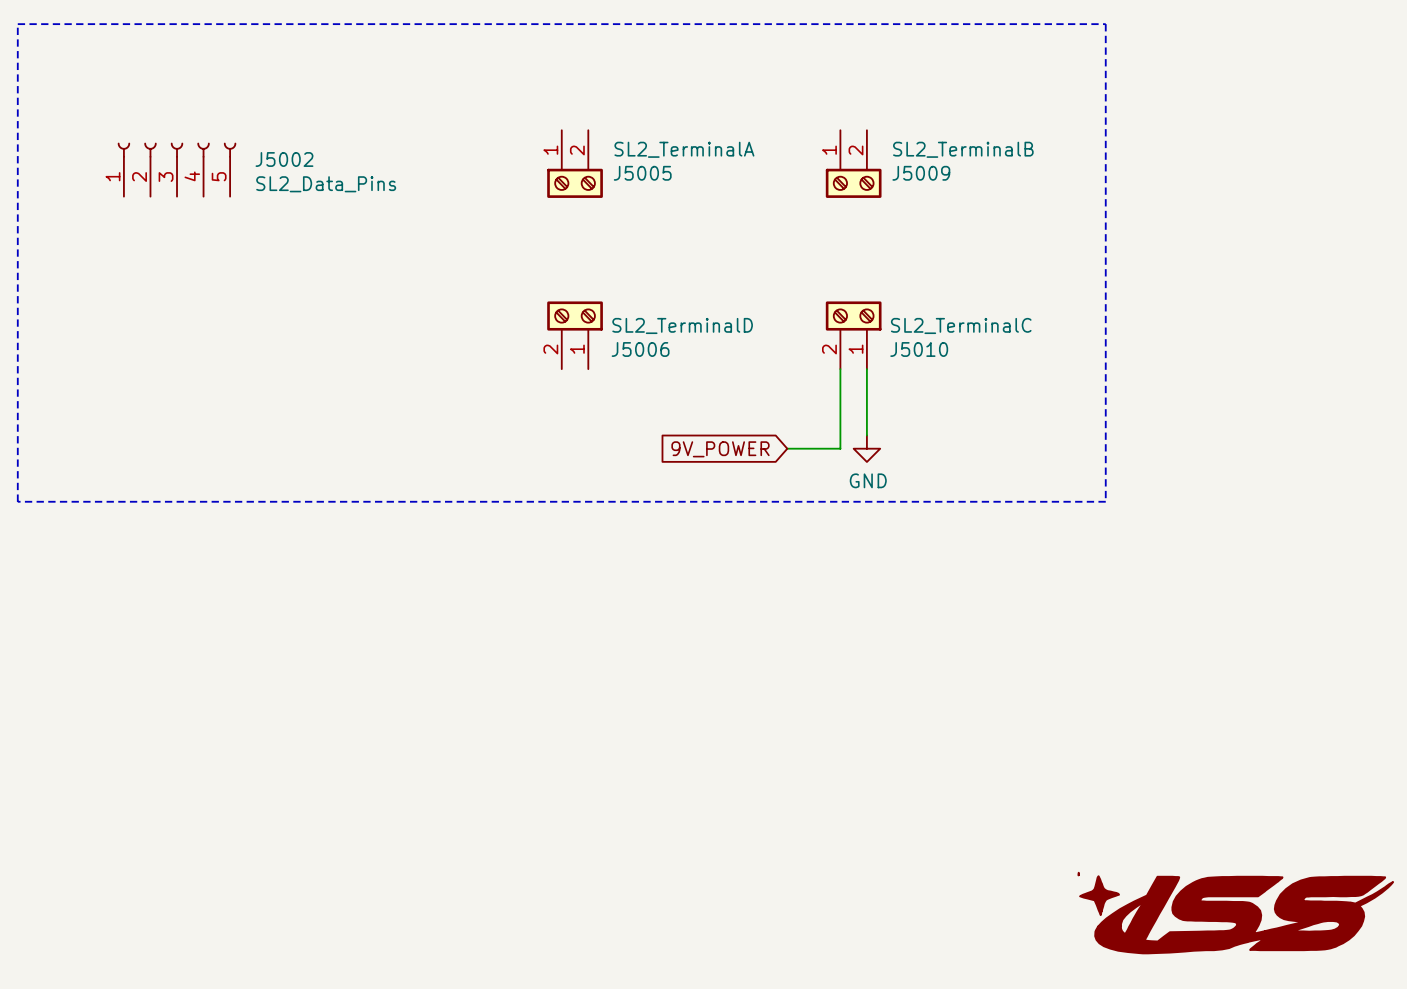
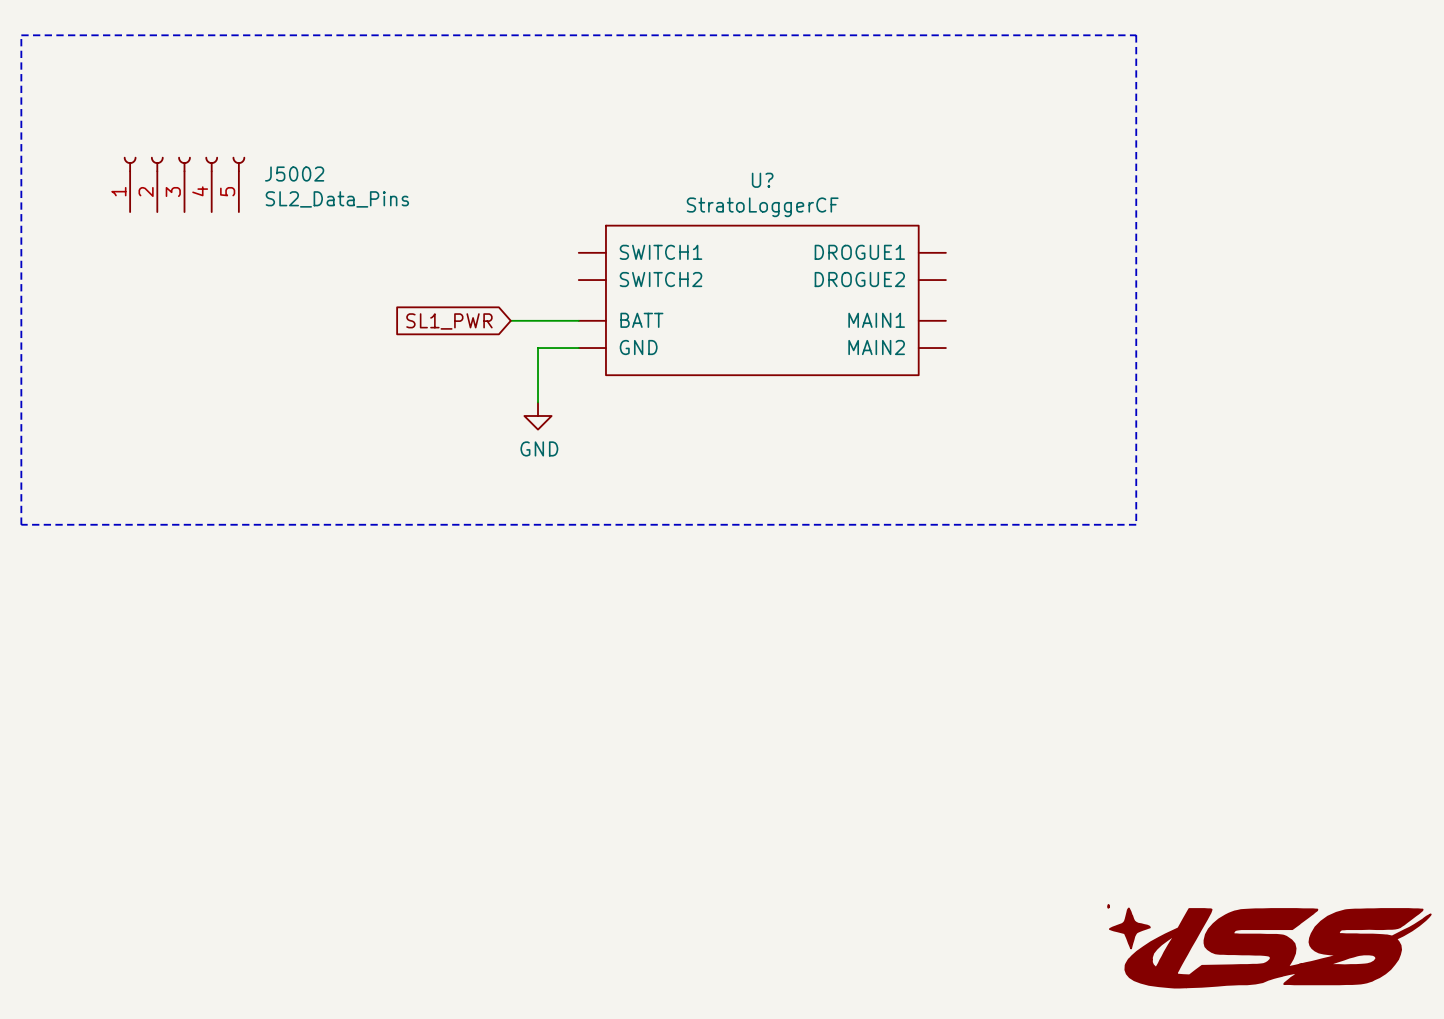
J5005: SL2_TerminalA (575, 164) -> none
J5009: SL2_TerminalB (853, 164) -> none
U?: none -> StratoLoggerCF (762, 300)
wire: none -> (510, 320) (578, 320)
global label: none -> SL1_PWR (449, 321)
wire: none -> (578, 348) (538, 348) (538, 402)
J5006: SL2_TerminalD (575, 335) -> none
J5010: SL2_TerminalC (853, 335) -> none
wire: (840, 369) (840, 448) (787, 448) -> none
wire: (866, 369) (866, 435) -> none
power symbol: none -> GND (538, 416)
power symbol: GND (866, 448) -> none
global label: 9V_POWER (720, 449) -> none

